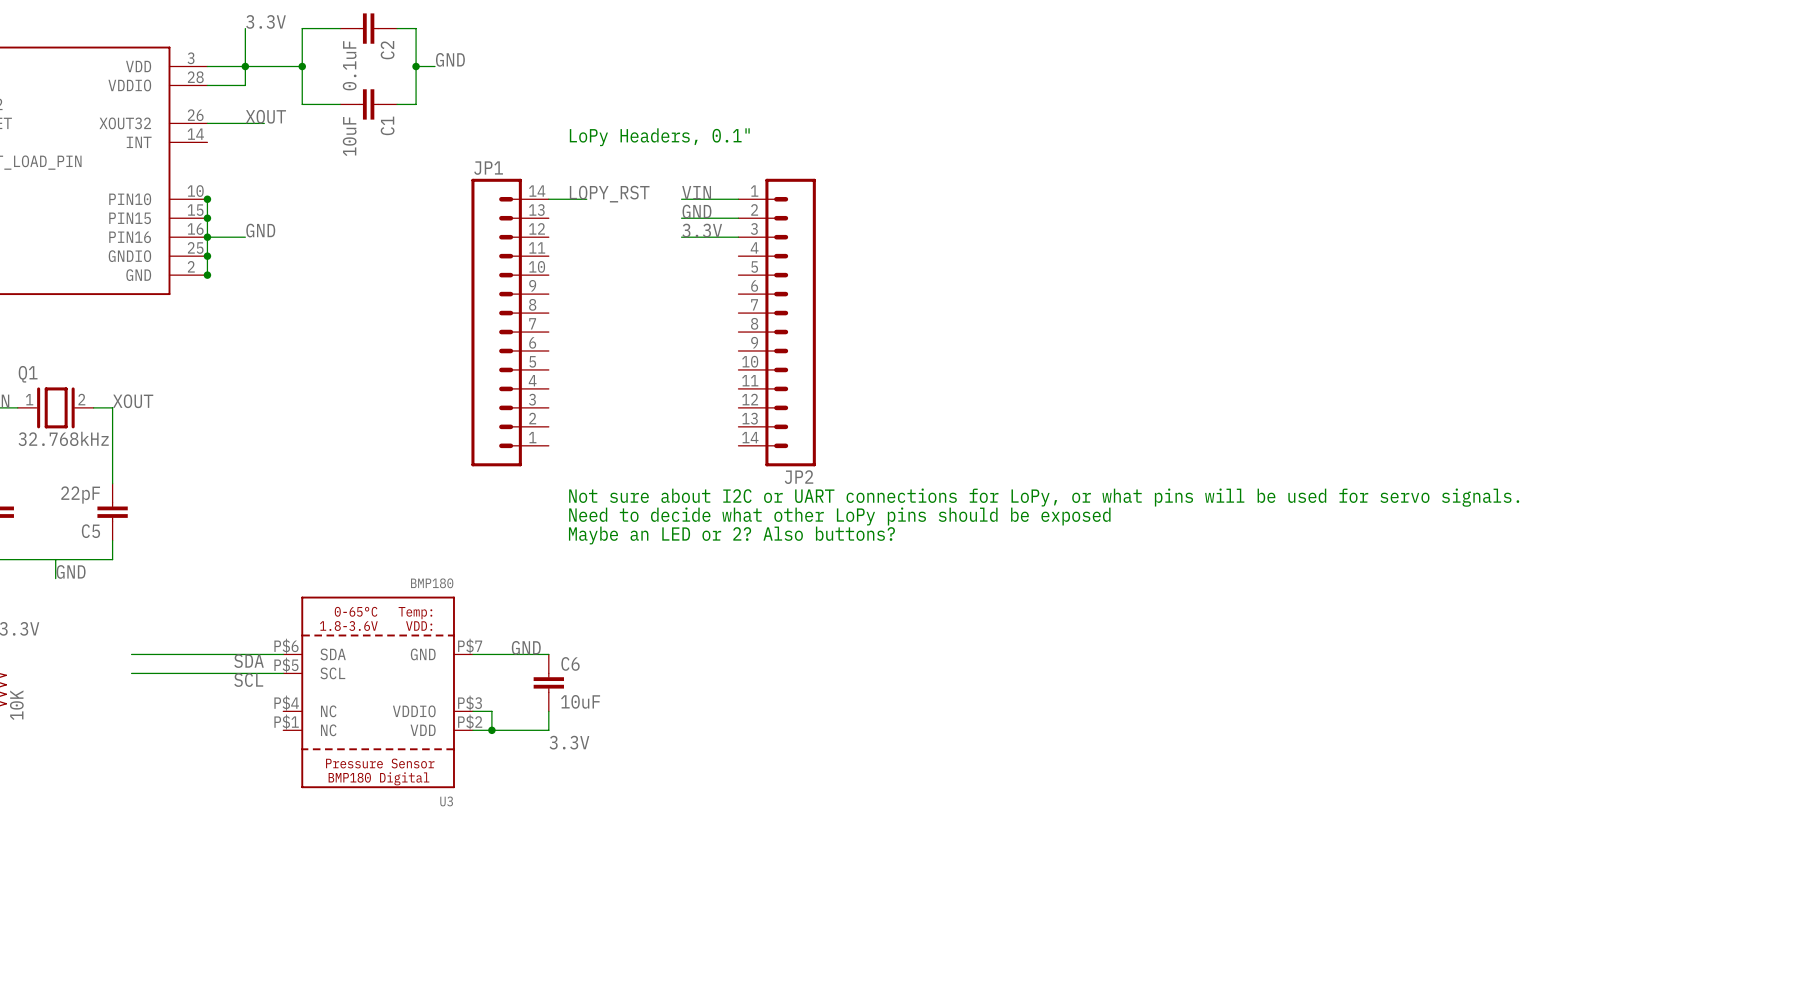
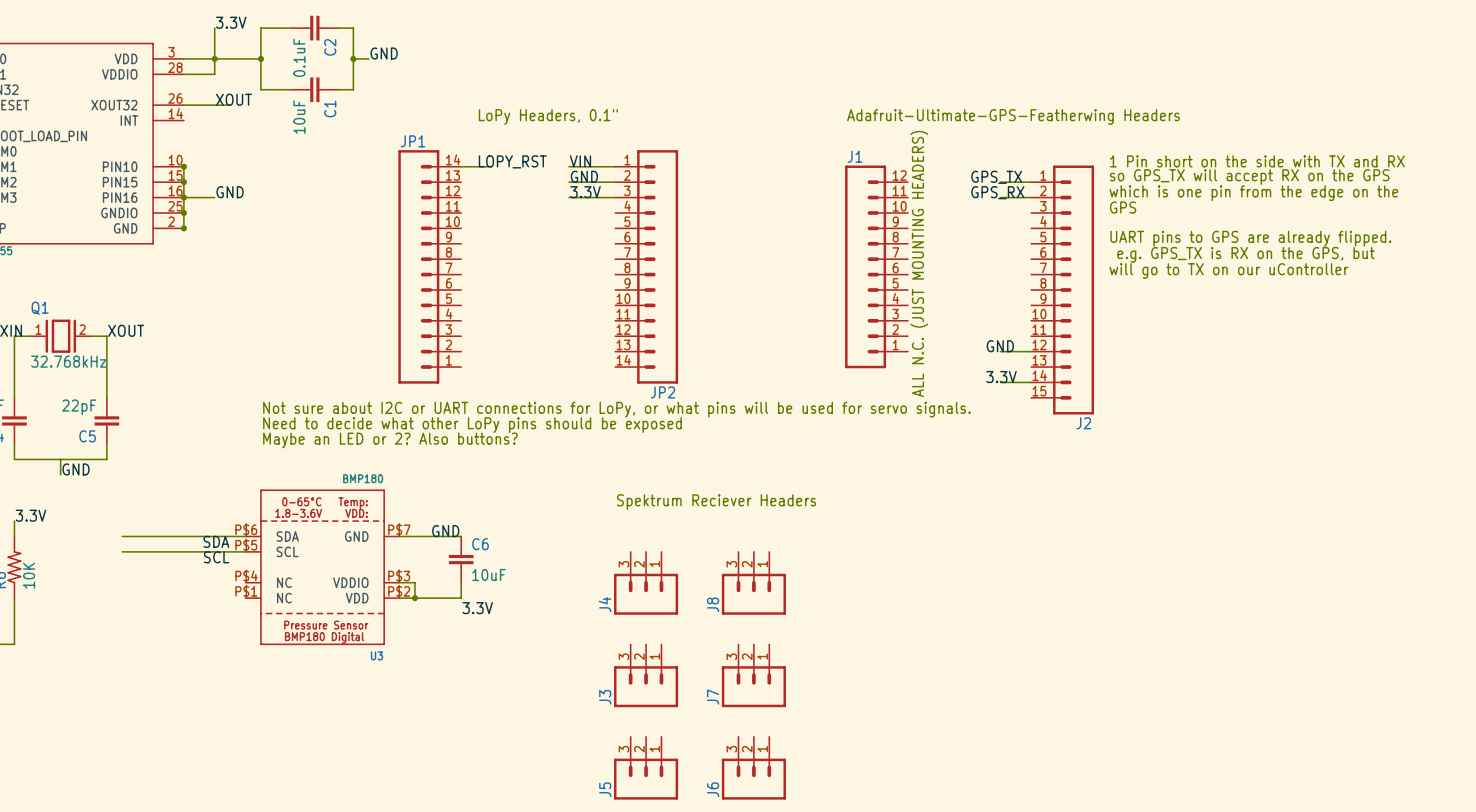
text: none -> Adafruit-Ultimate-GPS-Featherwing Headers (1013, 116)
text: none -> 1 Pin short on the side with TX and RX (1257, 161)
text: none -> so GPS_TX will accept RX on the GPS (1249, 177)
label: none -> GPS_TX (996, 177)
wire: none -> (1000, 182) (1031, 182)
text: none -> which is one pin from the edge on the (1253, 193)
label: none -> GPS_RX (997, 192)
wire: none -> (1000, 197) (1031, 197)
text: none -> GPS (1123, 207)
text: none -> UART pins to GPS are already flipped. (1250, 238)
text: none -> e.g. GPS_TX is RX on the GPS, but (1246, 254)
text: none -> ALL N.C. (JUST MOUNTING HEADERS) (919, 263)
J1: none -> (876, 266)
text: none -> will go to TX on our uController (1228, 271)
J2: none -> (1062, 290)
label: none -> GND (1000, 346)
wire: none -> (1000, 351) (1031, 351)
label: none -> 3.3V (1001, 377)
wire: none -> (1000, 382) (1031, 382)
text: none -> Not sure about I2C or UART connections for LoPy, or what pins will be used for servo signals. (616, 409)
text: Not sure about I2C or UART connections for LoPy, or what pins will be used for servo signals. (1044, 497) -> none
text: none -> Need to decide what other LoPy pins should be exposed (472, 425)
text: Need to decide what other LoPy pins should be exposed (839, 516) -> none
text: none -> Maybe an LED or 2? Also buttons? (390, 440)
text: Maybe an LED or 2? Also buttons? (731, 535) -> none
text: none -> Spektrum Reciever Headers (716, 502)
J4: none -> (646, 583)
J8: none -> (753, 583)
J3: none -> (646, 675)
J7: none -> (753, 675)
J5: none -> (646, 768)
J6: none -> (753, 768)

